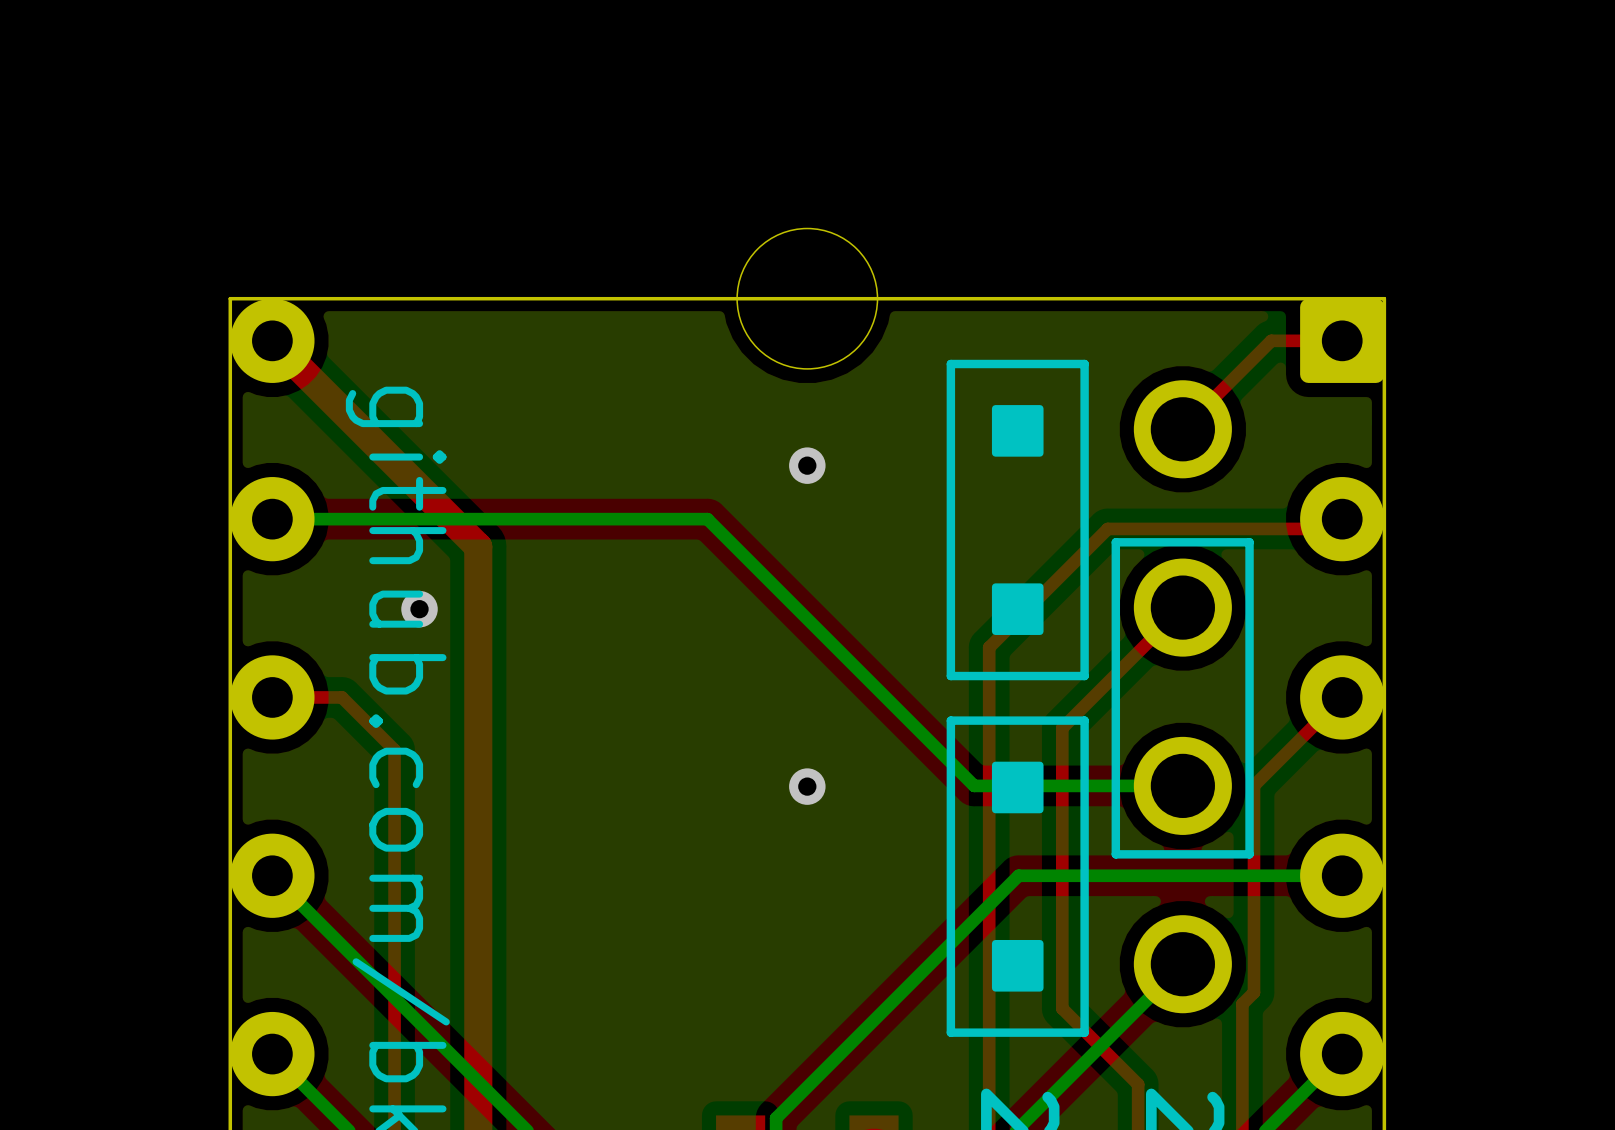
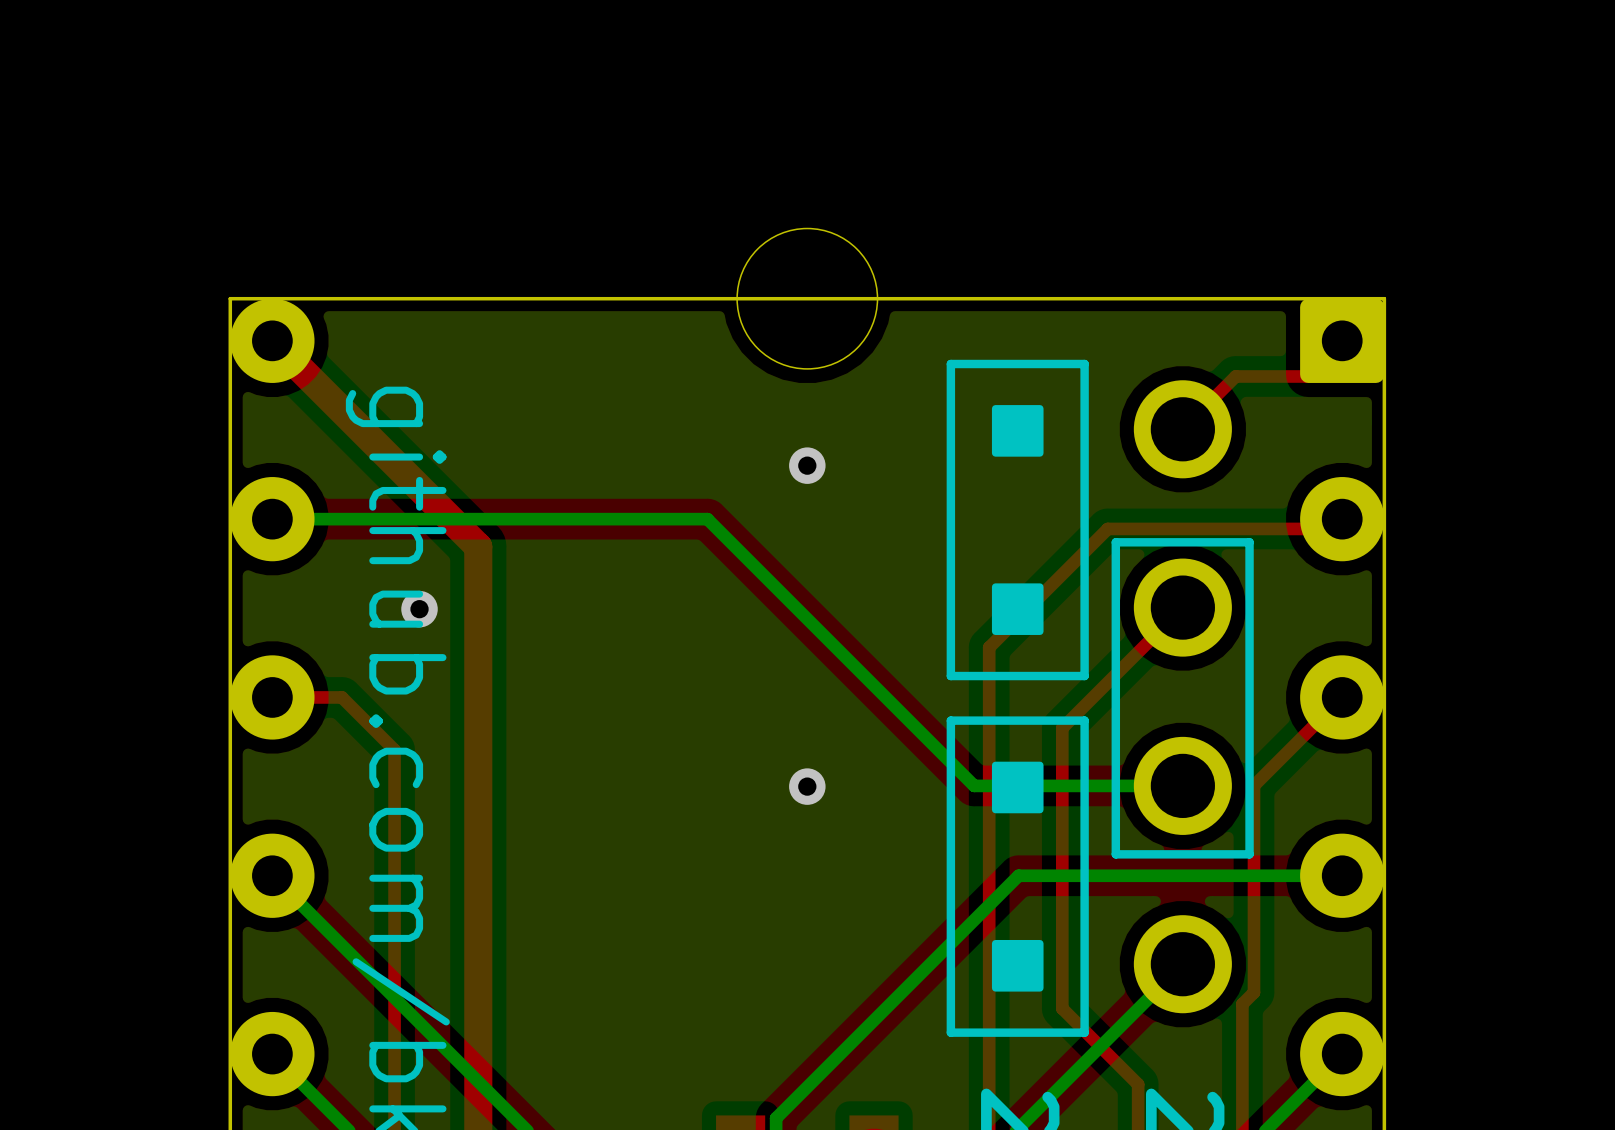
top track: (1342, 340) (1271, 340) (1235, 376) -> (1342, 340) (1306, 376) (1235, 376)

